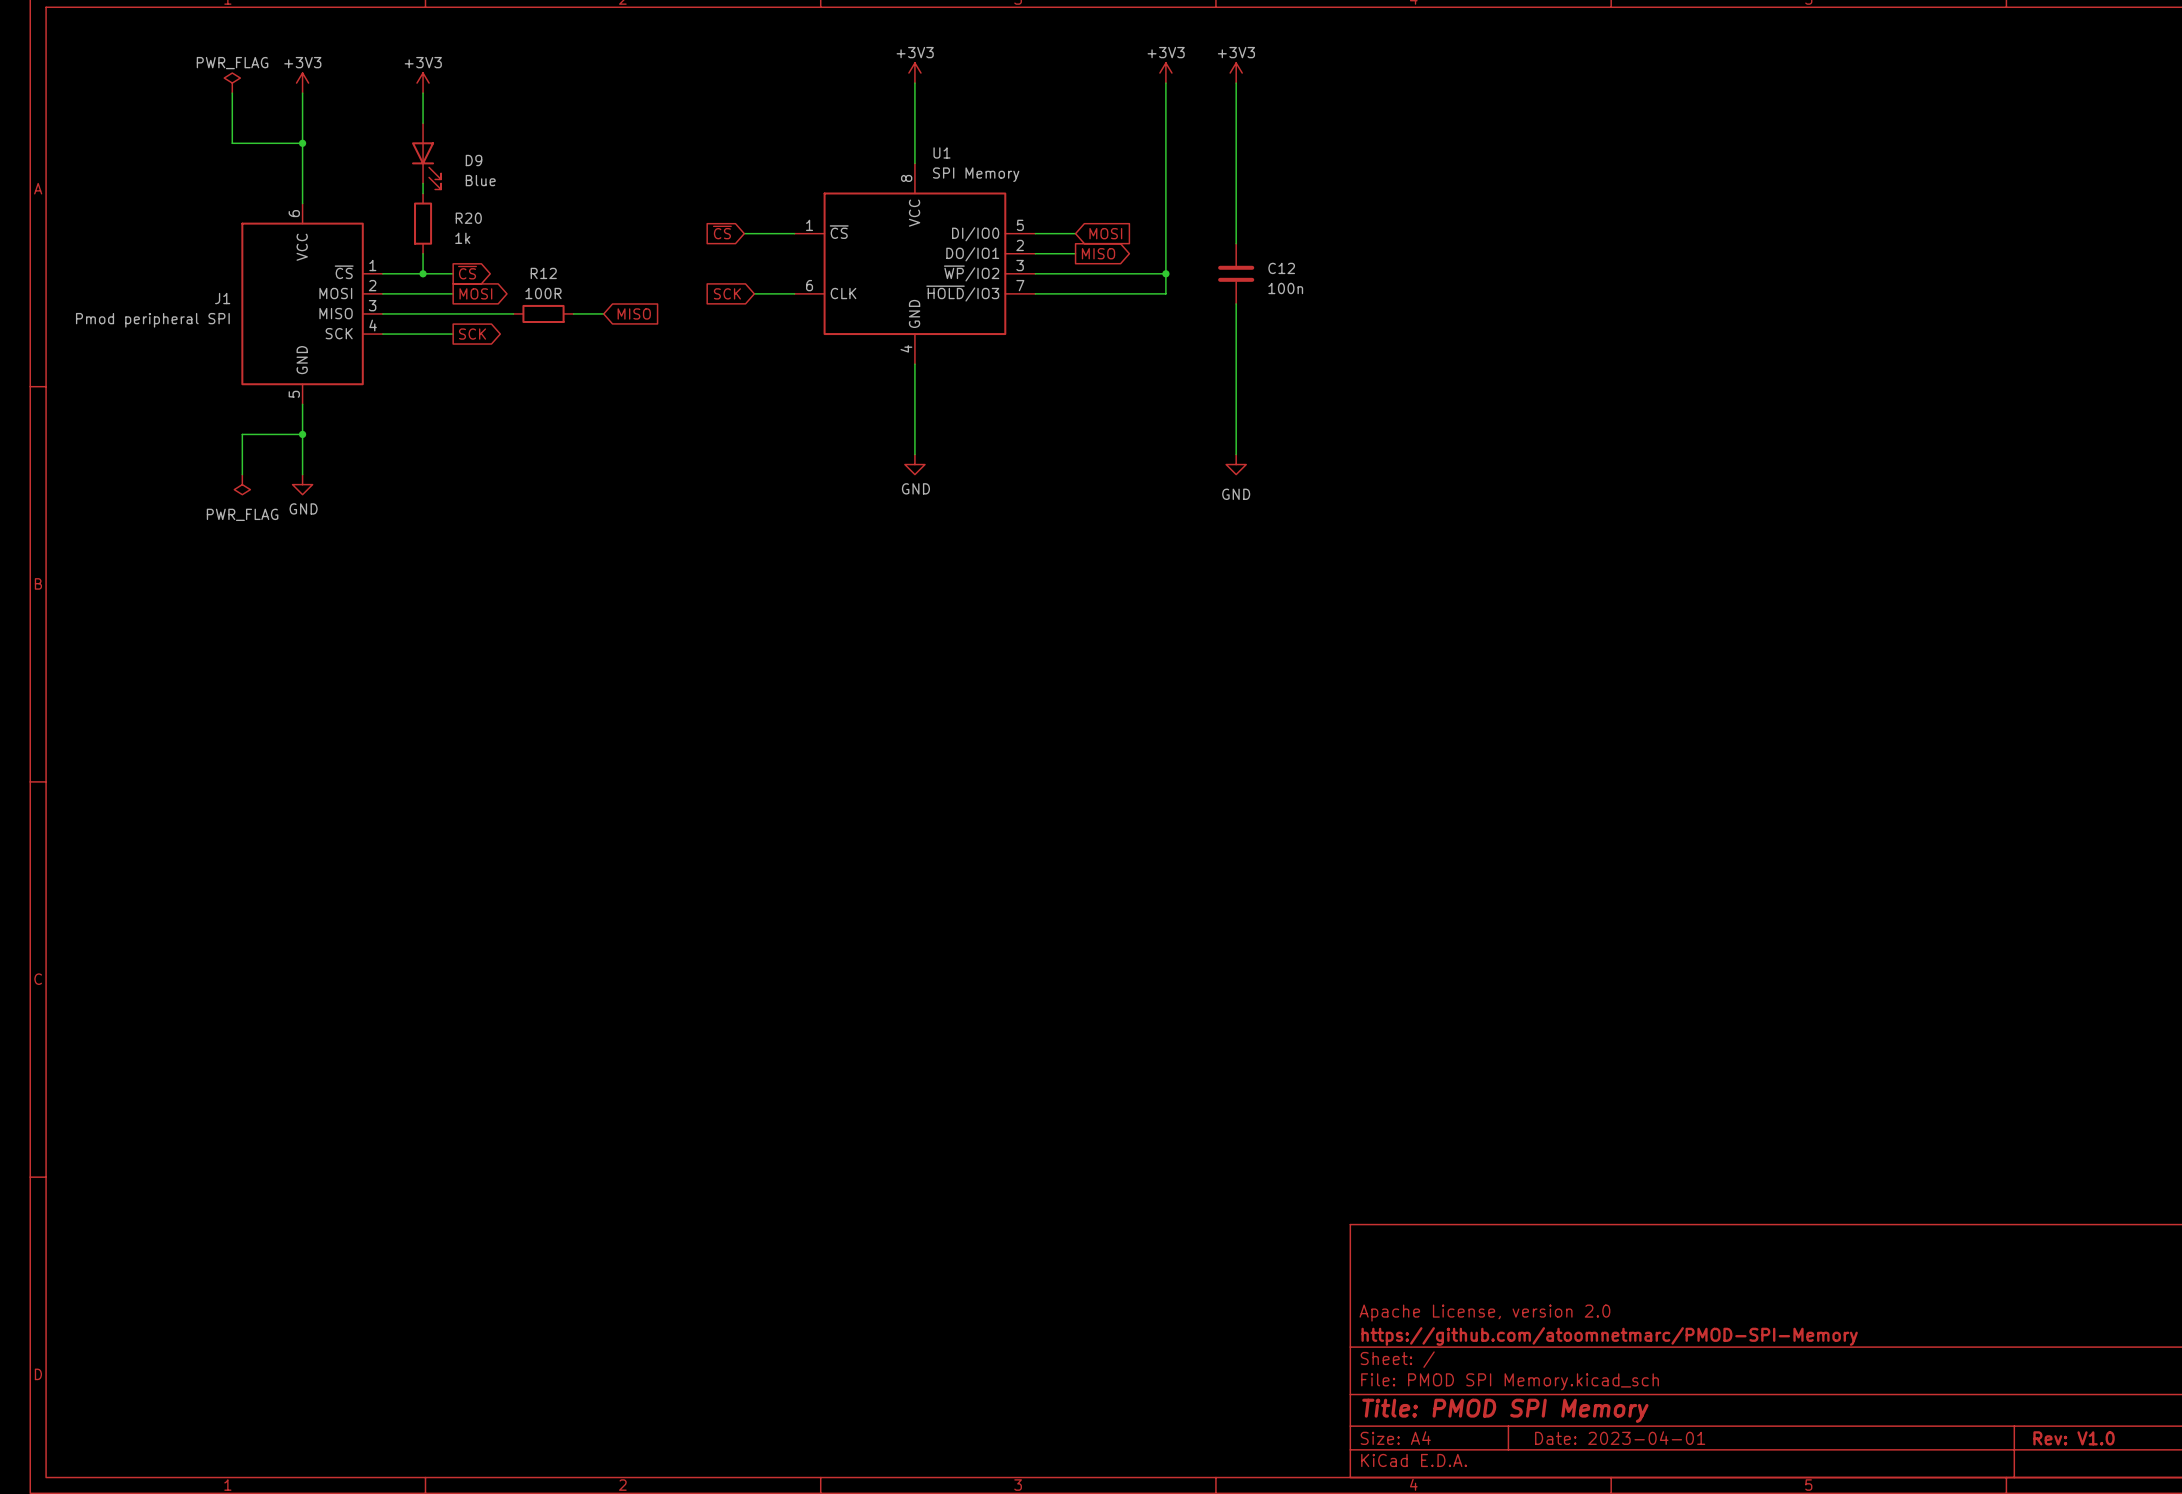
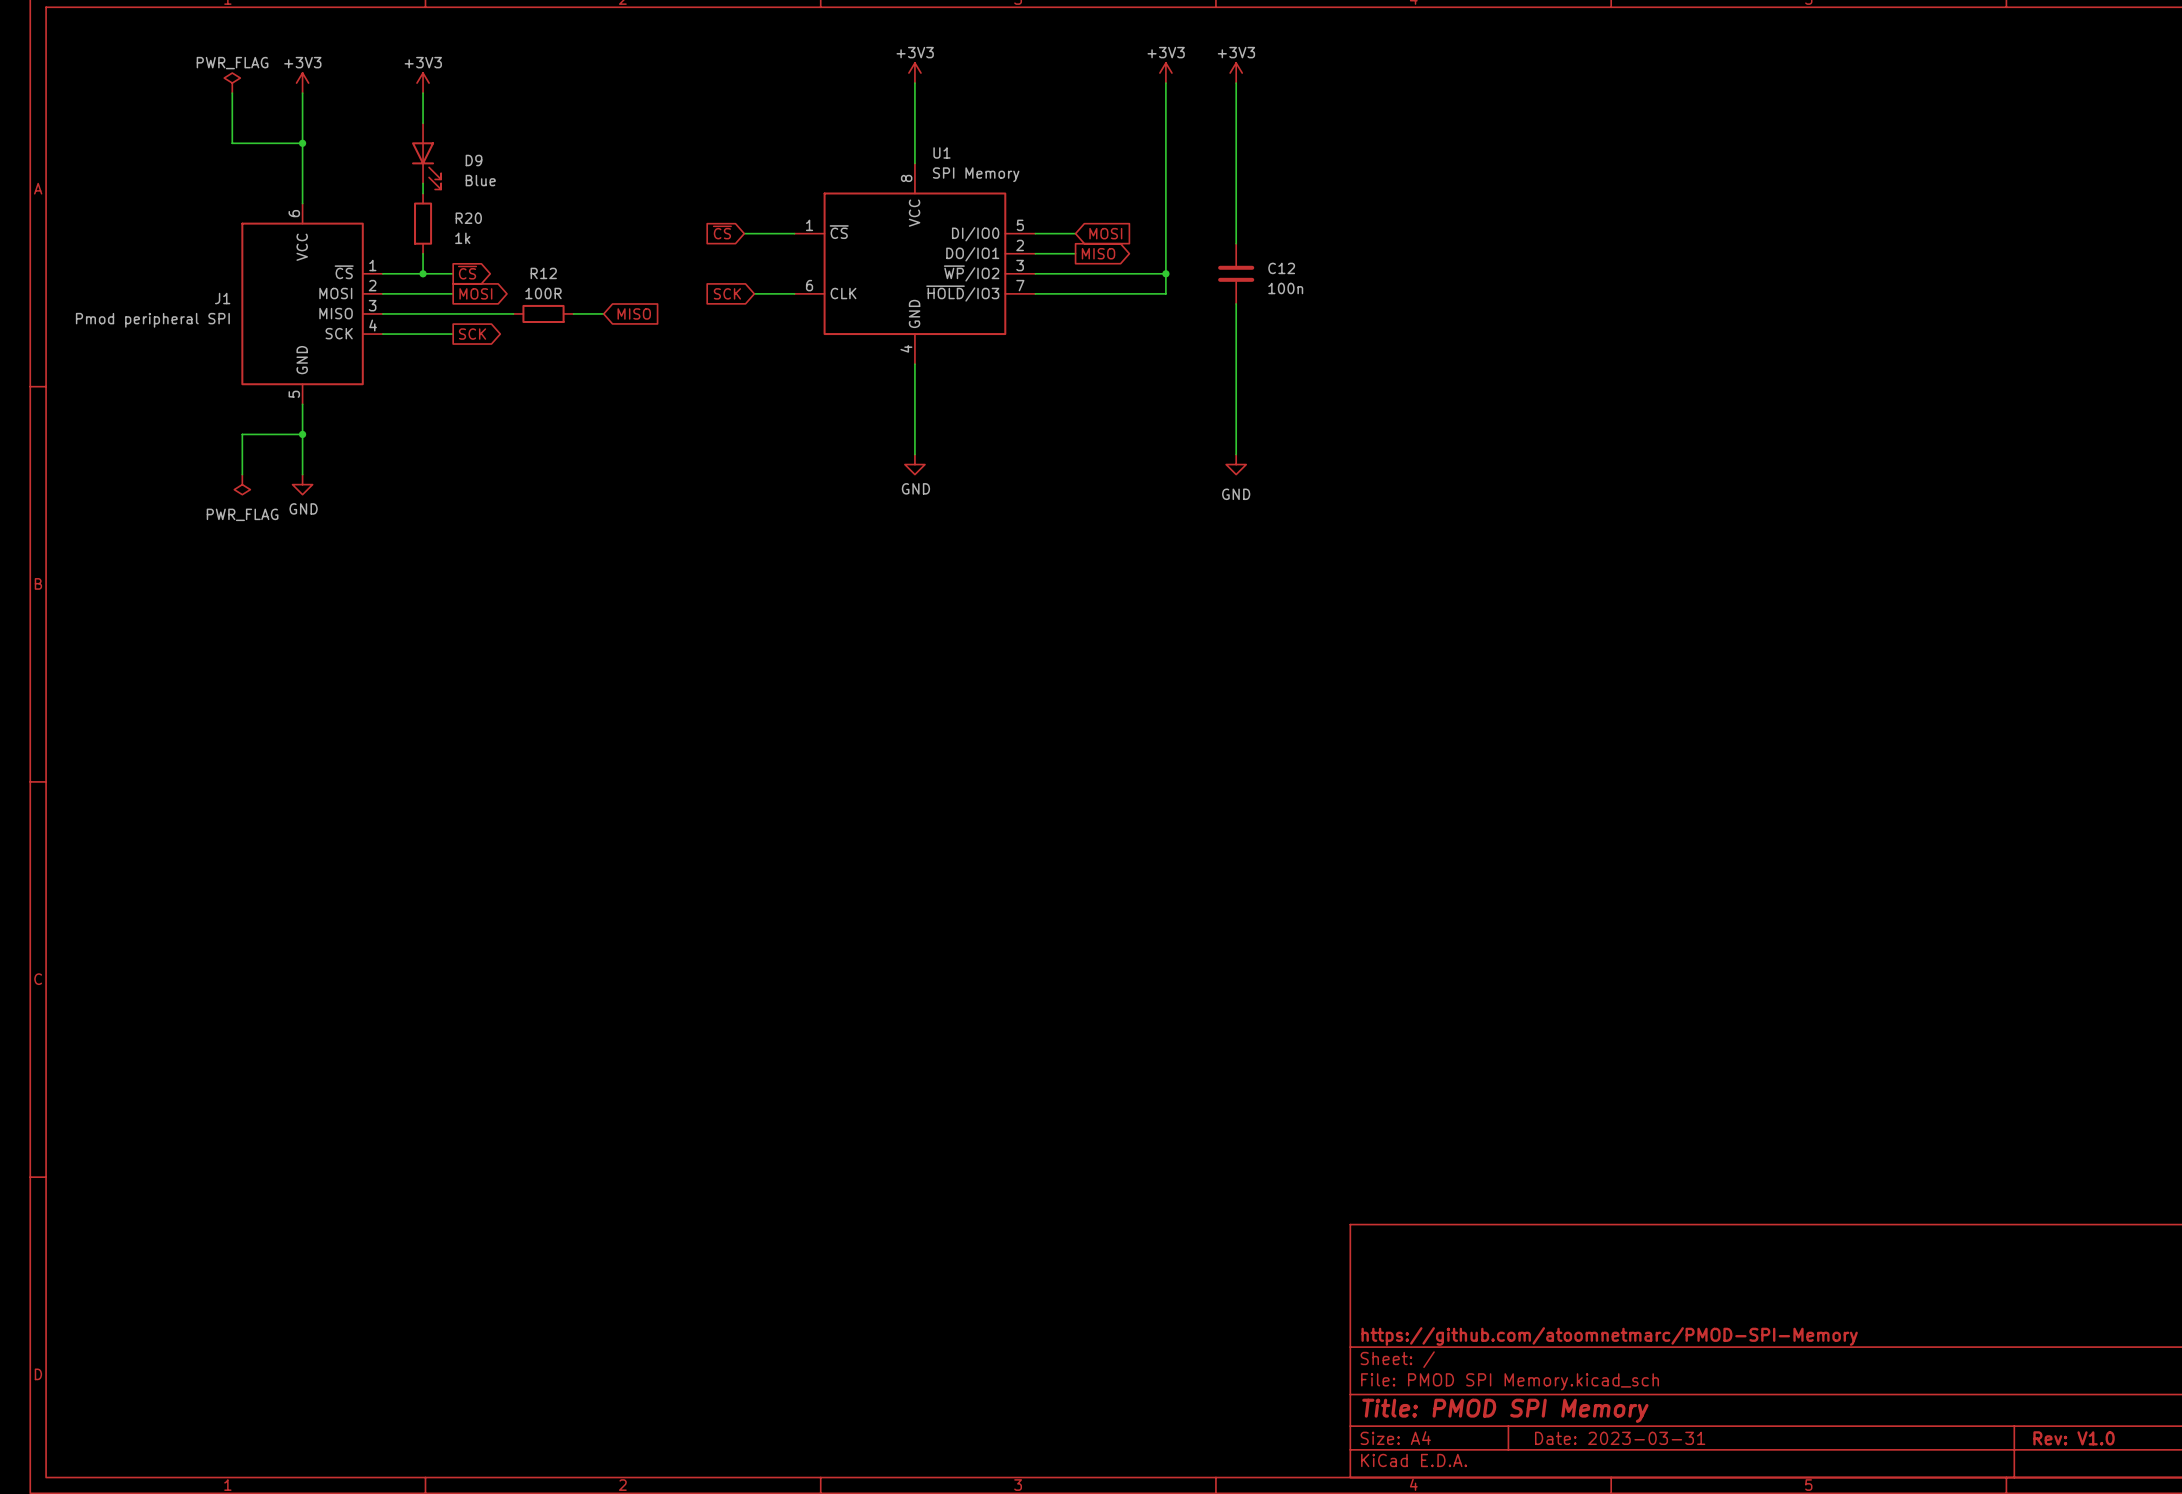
title block: Apache License, version 2.0 (1484, 1313) -> none
title block: Date: 2023-04-01 (1620, 1438) -> Date: 2023-03-31 (1620, 1438)

